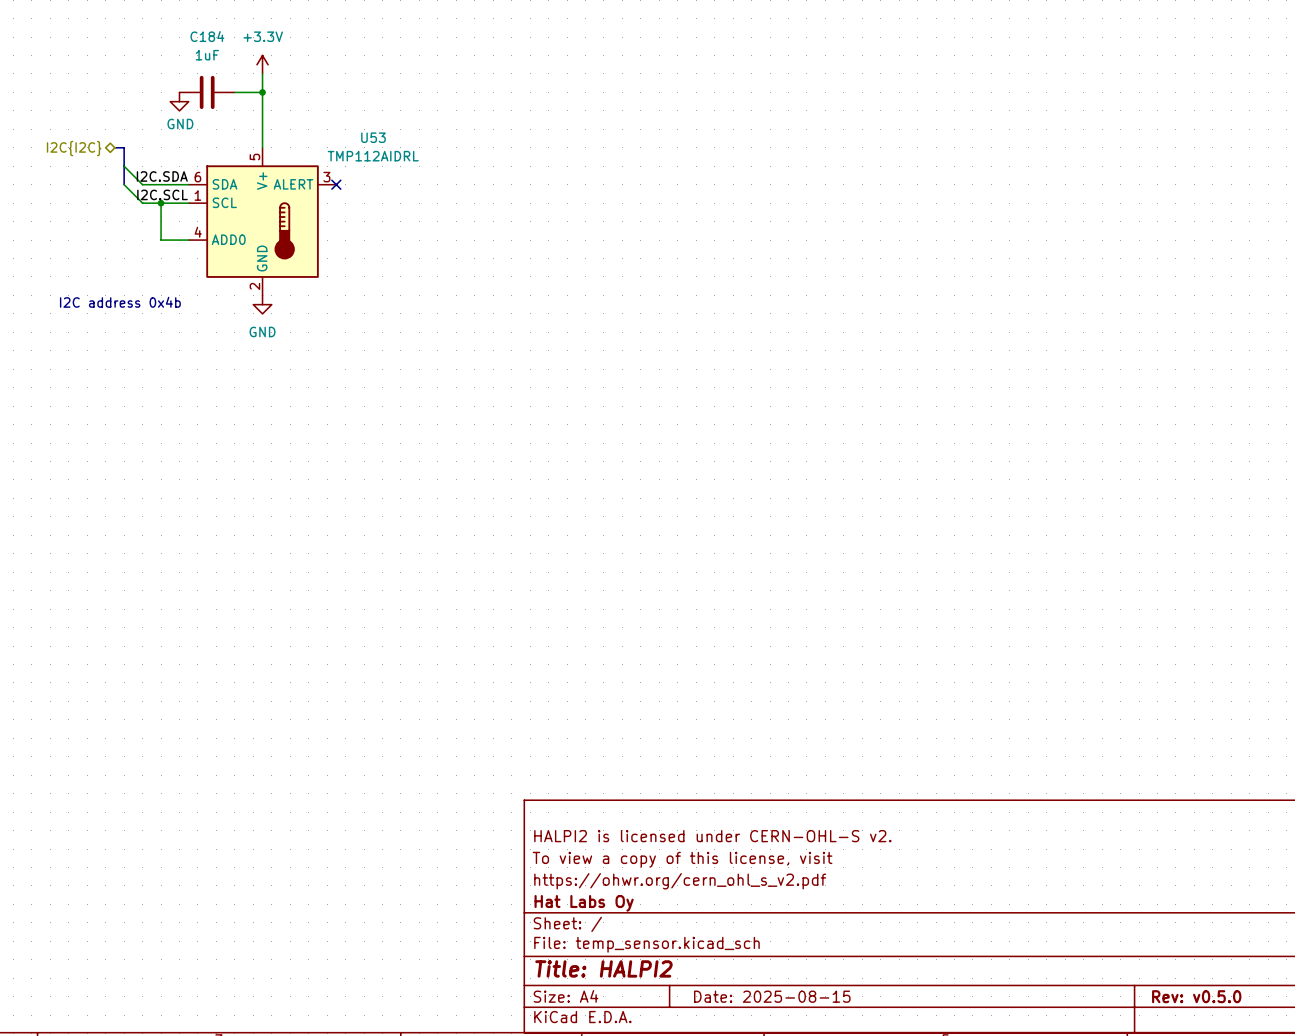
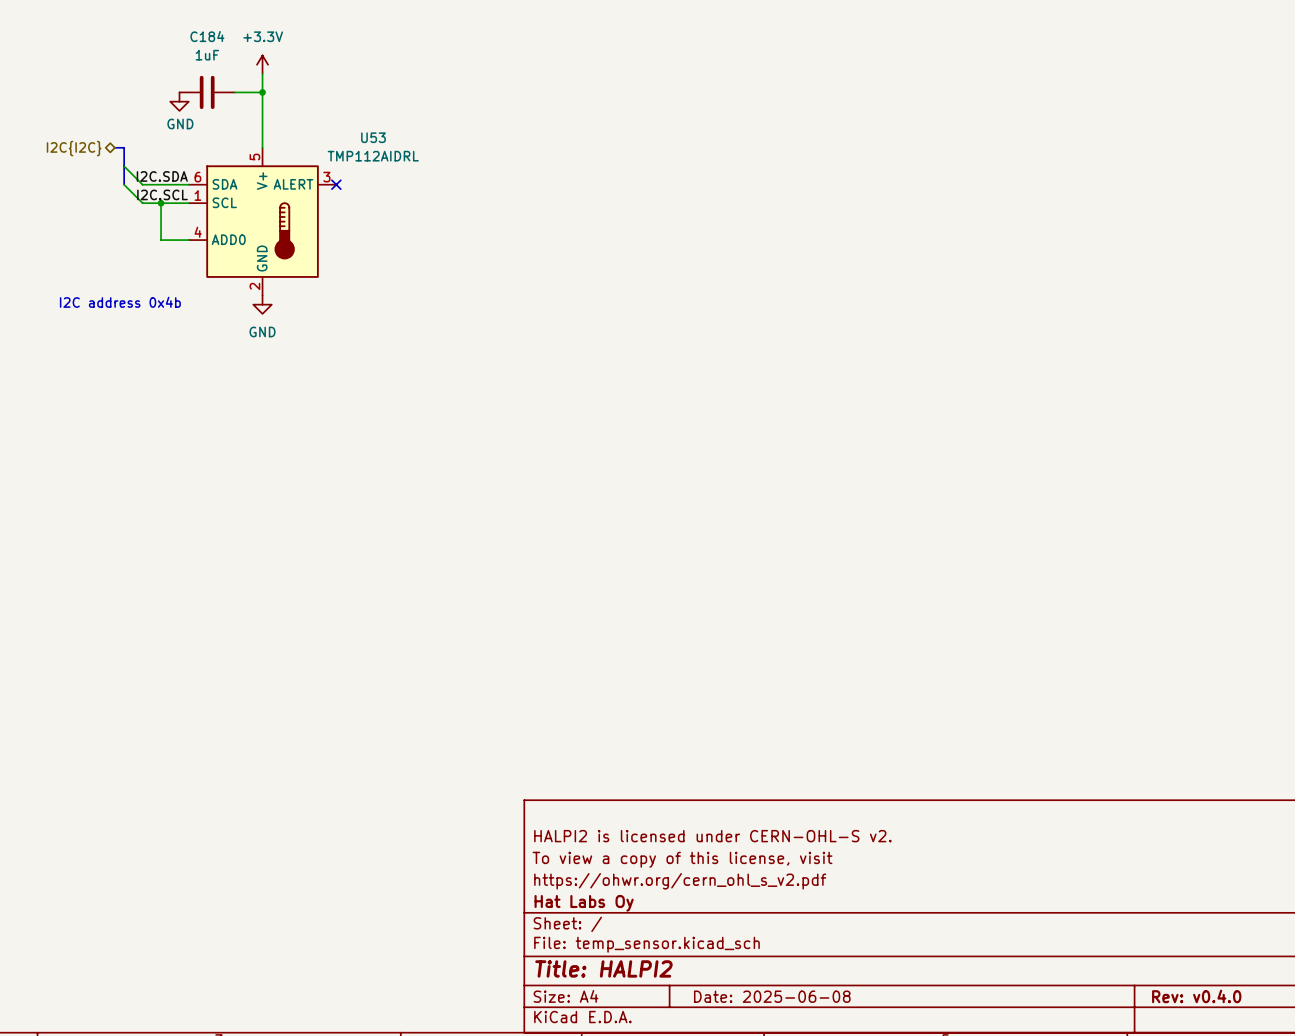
title block: Date: 2025-08-15 (772, 996) -> Date: 2025-06-08 (772, 996)
title block: Rev: v0.5.0 (1196, 996) -> Rev: v0.4.0 (1196, 996)

